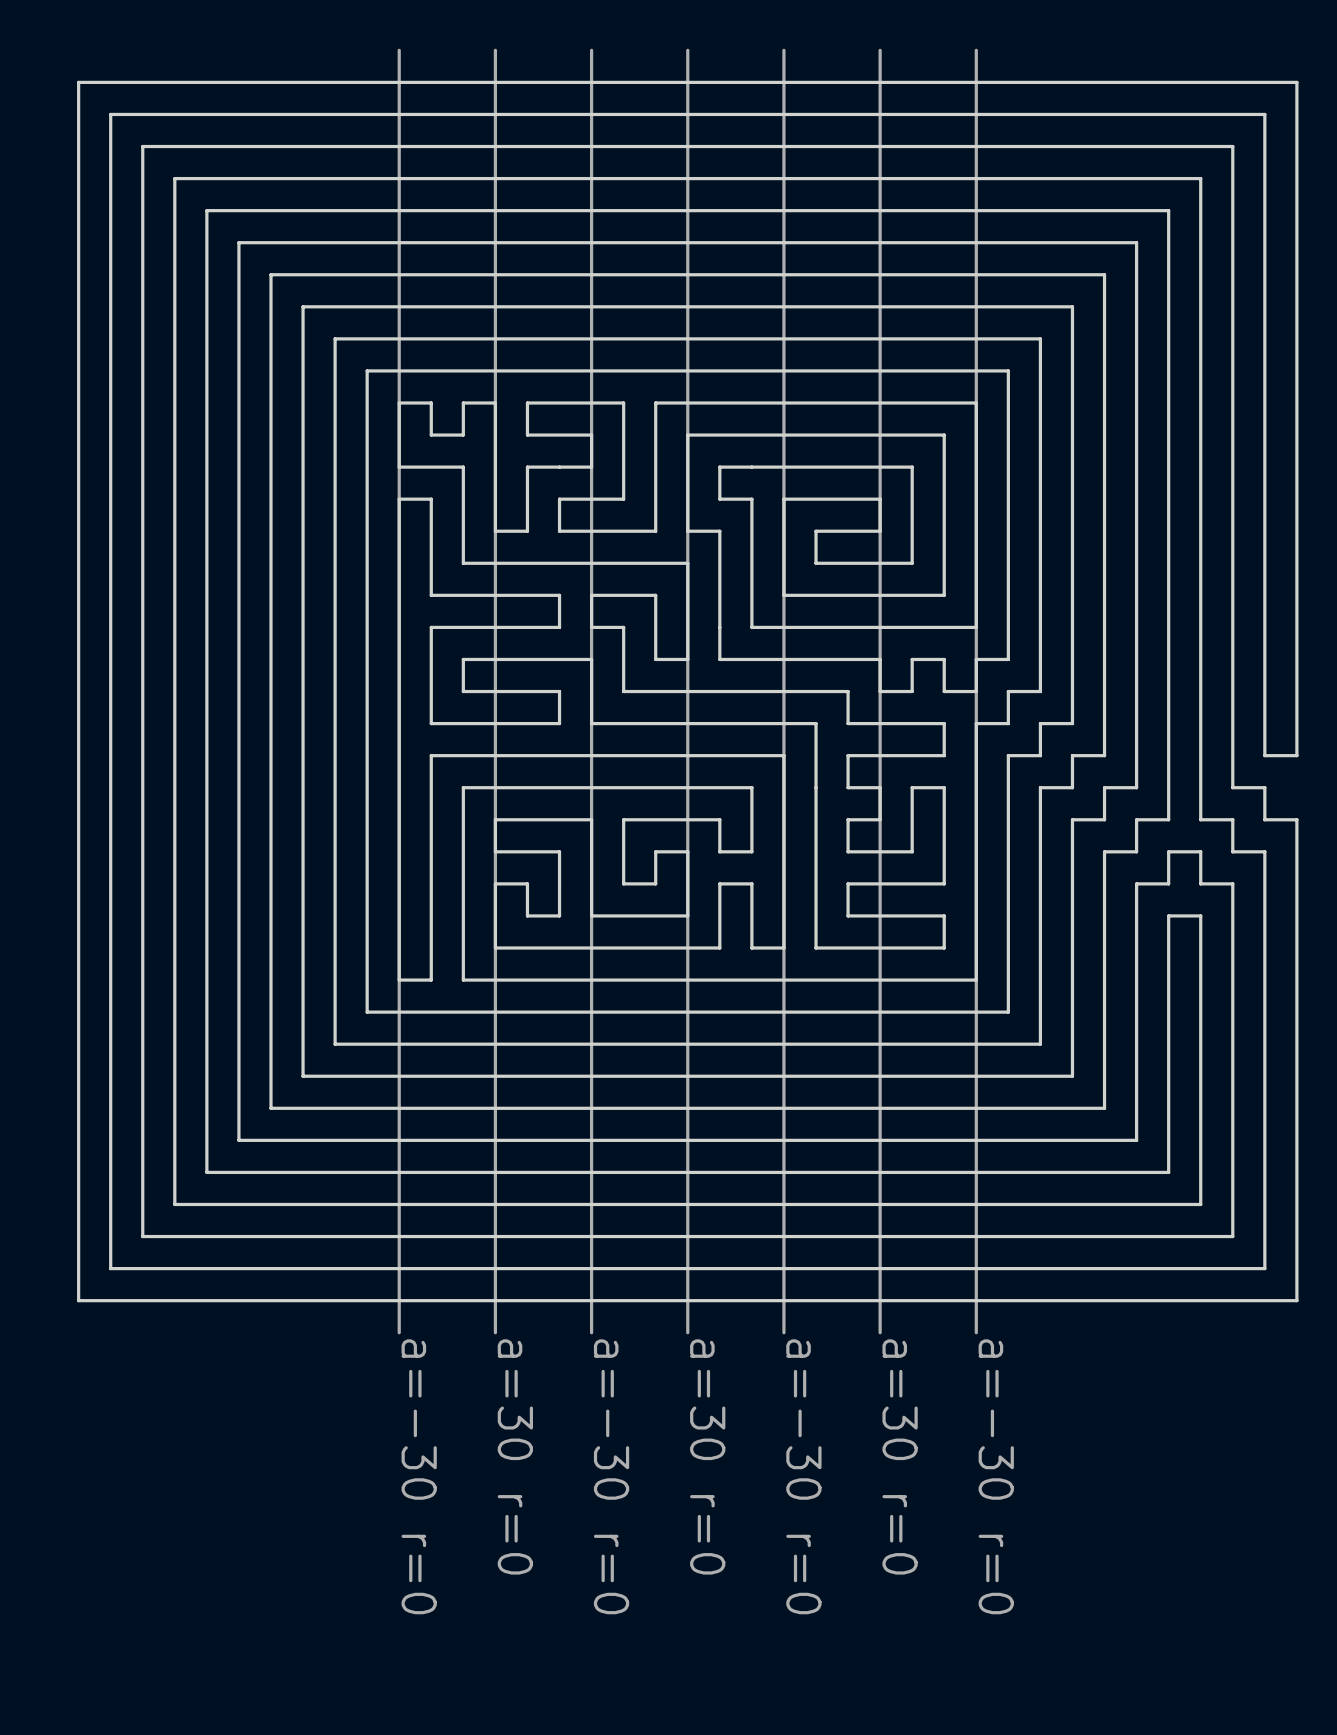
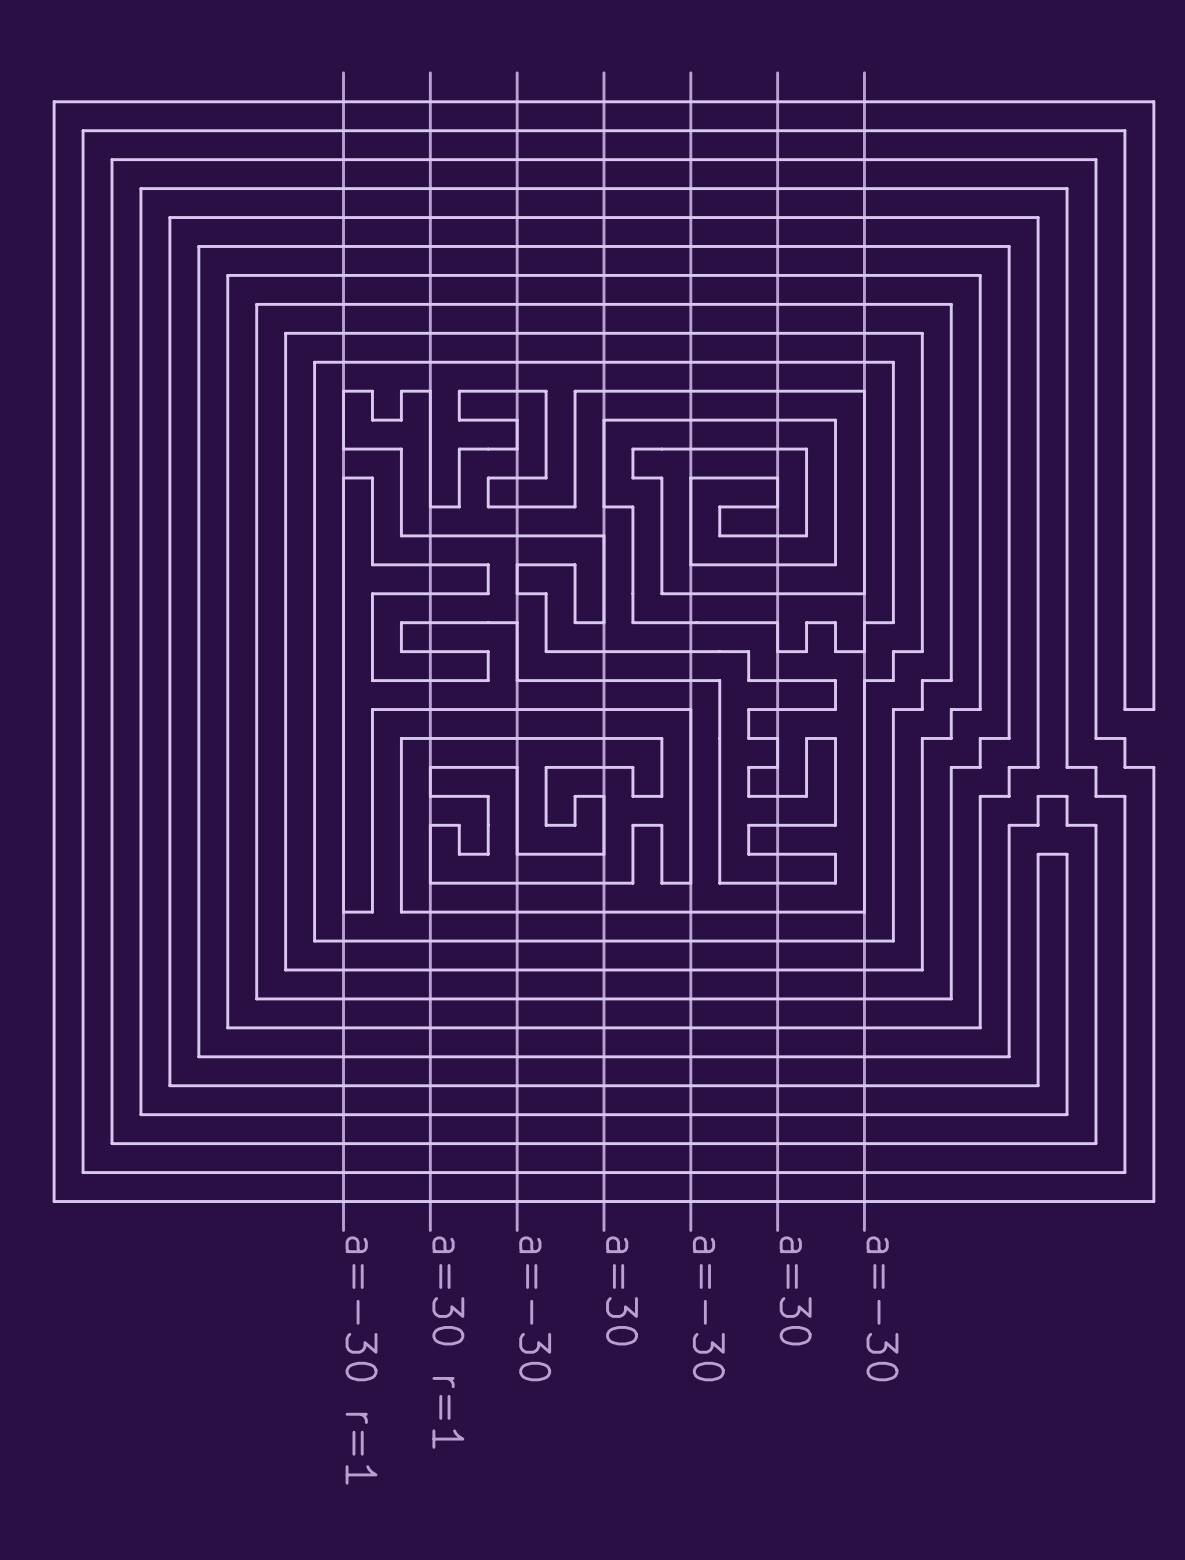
text: a=30 r=0 (515, 1456) -> a=30 r=1 (448, 1342)
text: a=30 r=0 (707, 1456) -> a=30 (621, 1290)
text: a=30 r=0 (900, 1456) -> a=30 (795, 1290)
text: a=-30 r=0 (419, 1476) -> a=-30 r=1 (361, 1360)
text: a=-30 r=0 (611, 1476) -> a=-30 (535, 1308)
text: a=-30 r=0 (803, 1476) -> a=-30 (708, 1308)
text: a=-30 r=0 (996, 1476) -> a=-30 (882, 1308)

